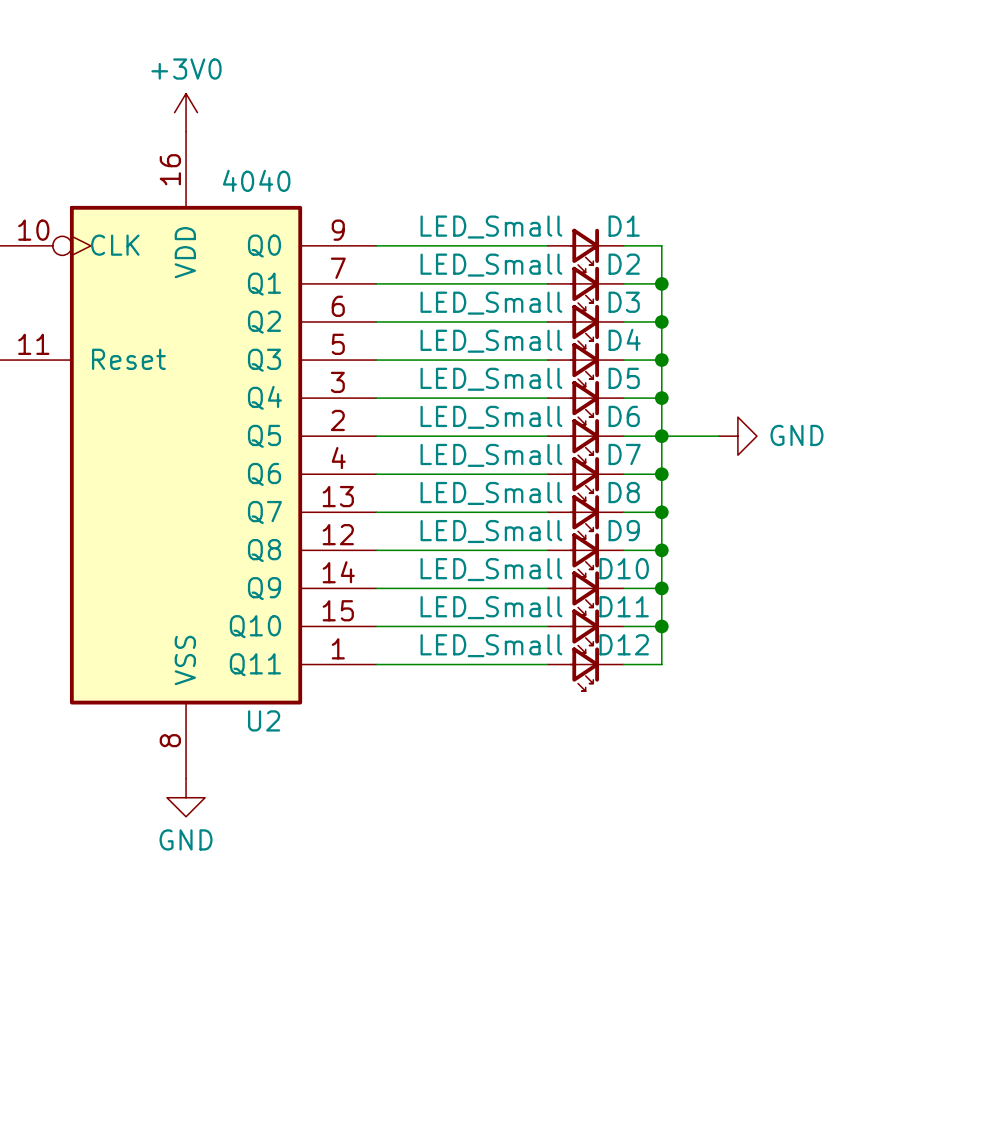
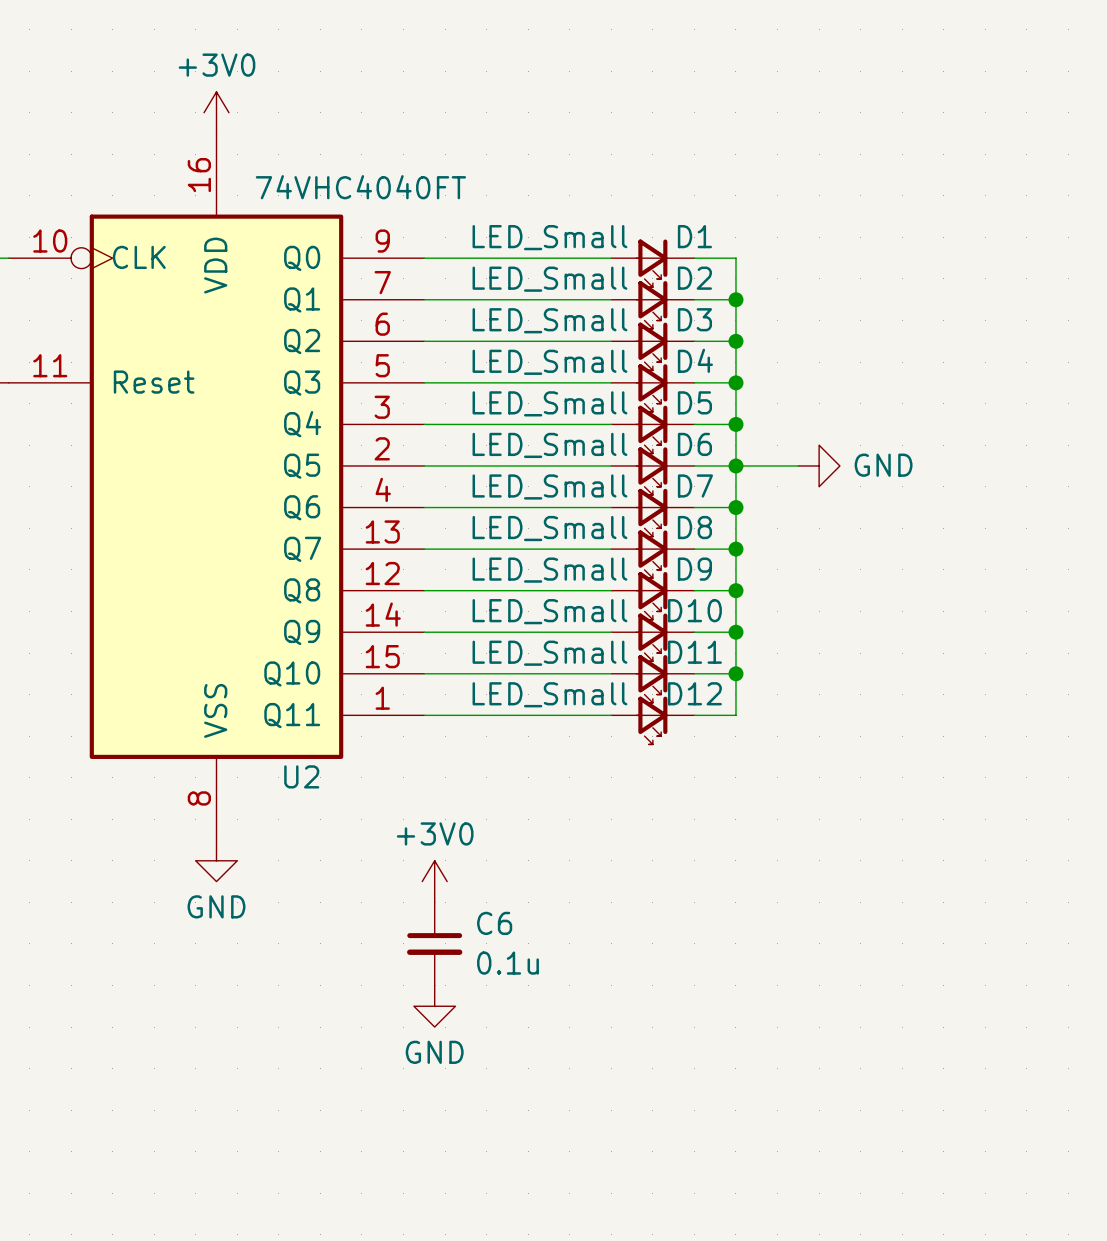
U2 value: 4040 (256, 180) -> 74VHC4040FT (360, 187)
power symbol: none -> +3V0 (434, 881)
C6: none -> 0.1u (434, 943)
power symbol: none -> GND (434, 1006)

